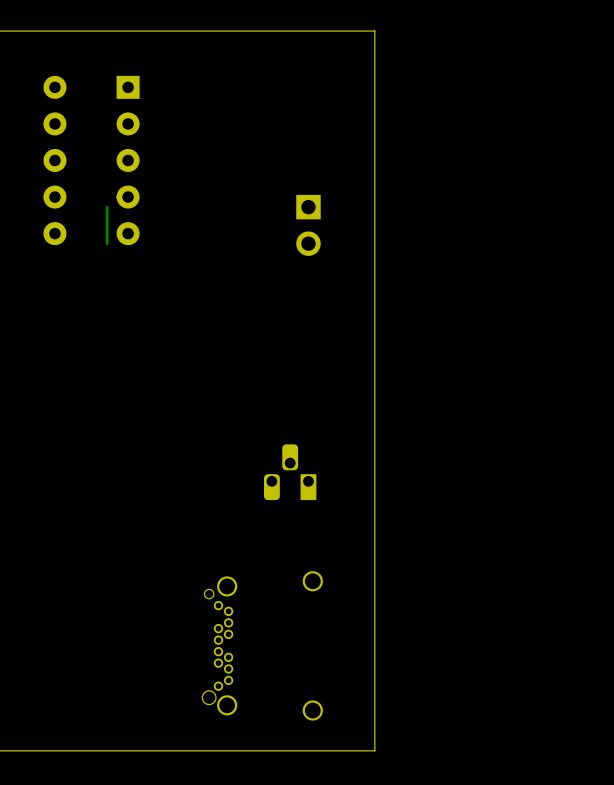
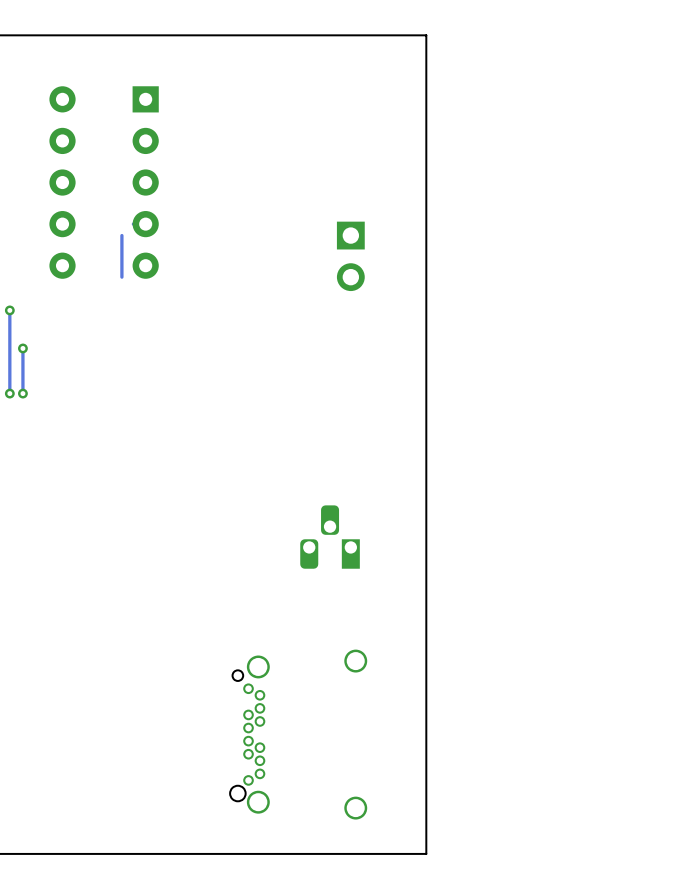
track: none -> (9, 310) (9, 393)
via: none -> (9, 310)
track: none -> (22, 347) (22, 393)
via: none -> (22, 348)
via: none -> (9, 393)
via: none -> (22, 393)

